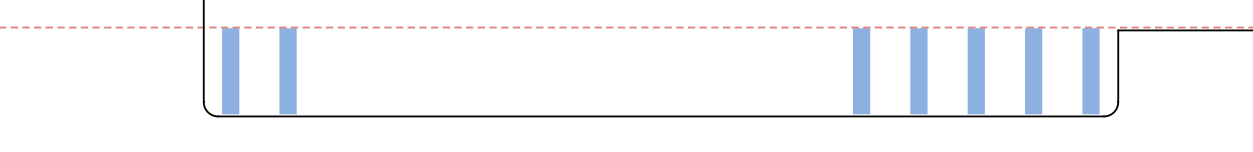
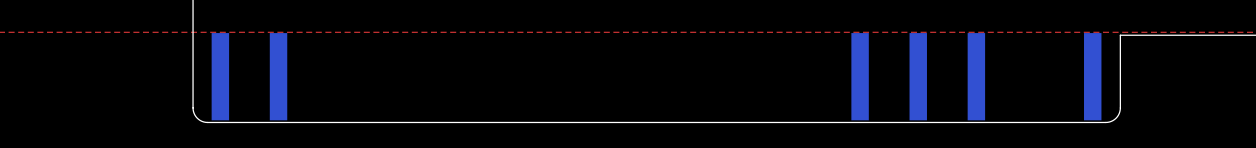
part: (1033, 71) -> none

